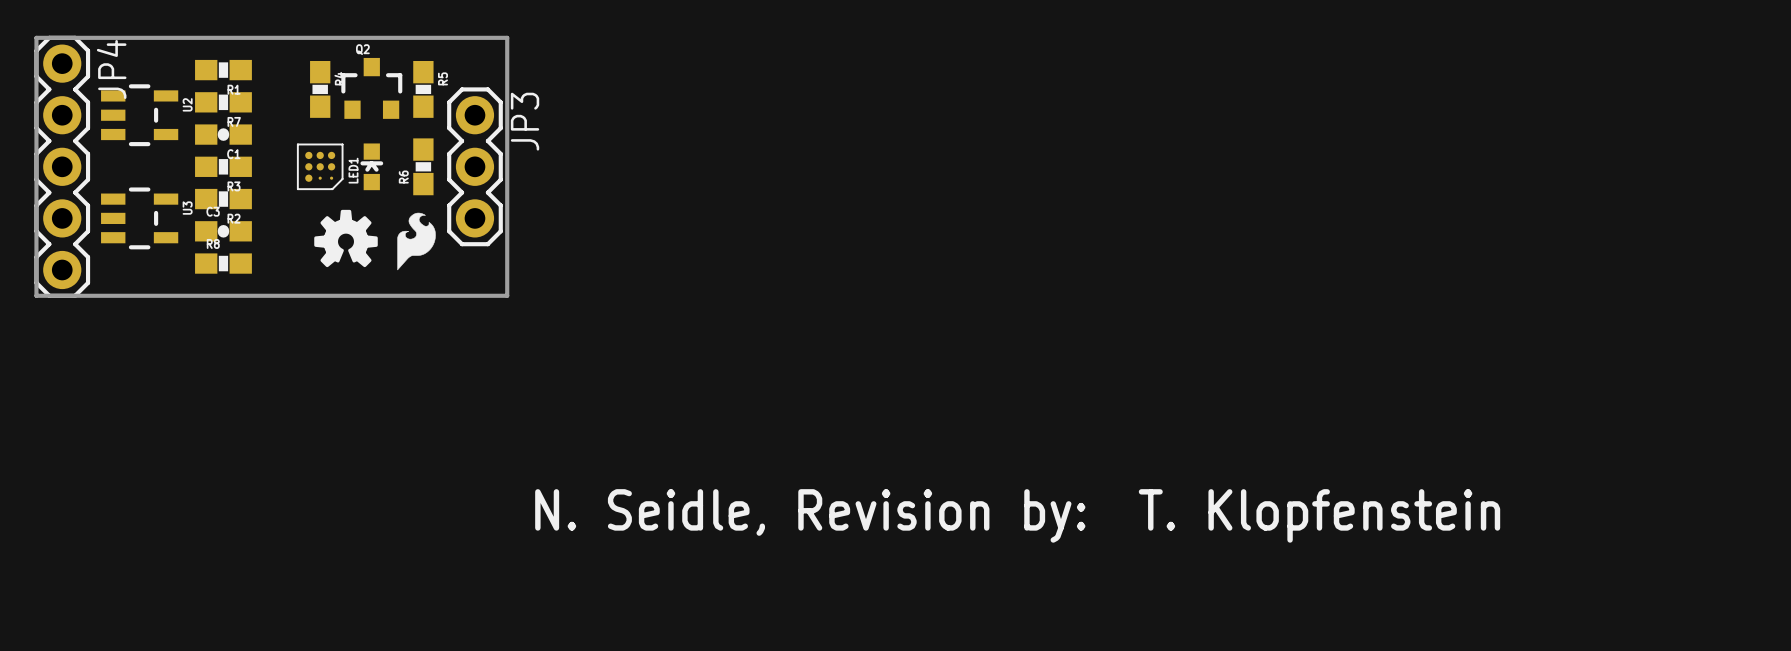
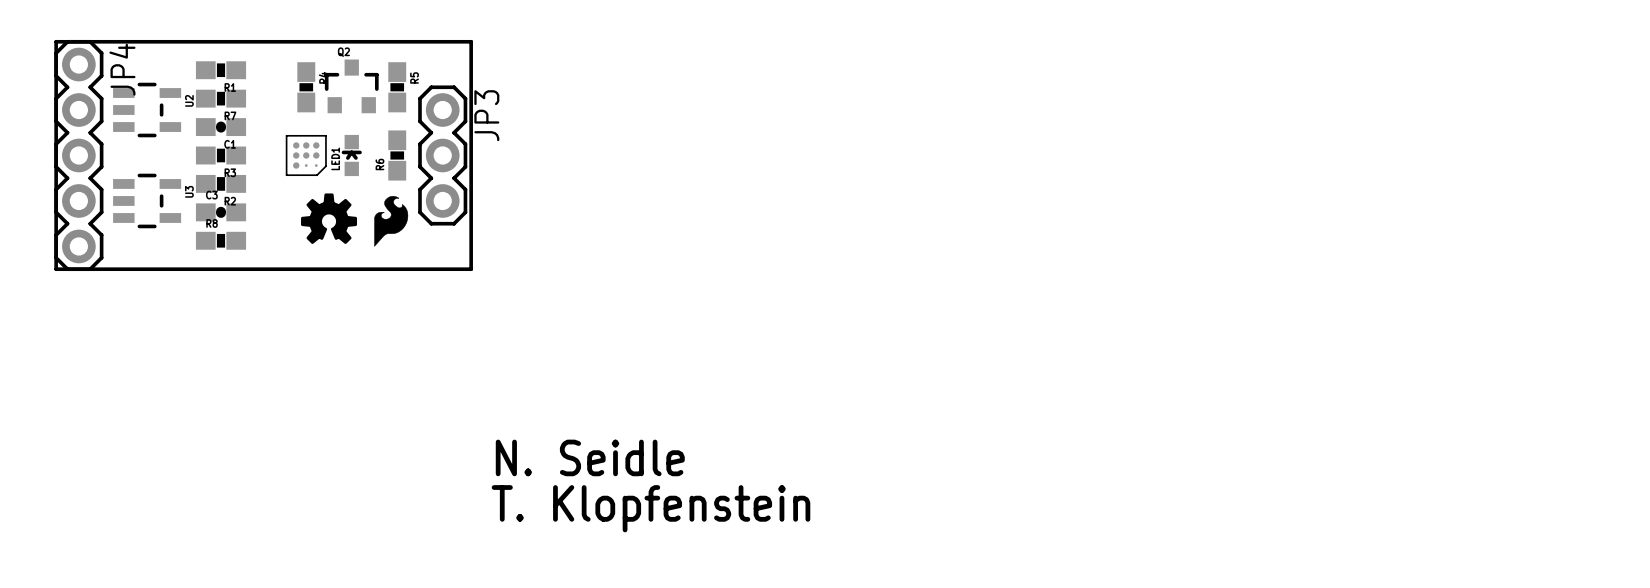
text: N. Seidle, Revision by: T. Klopfenstein (1017, 515) -> N. Seidle (590, 457)
text: none -> T. Klopfenstein (650, 508)

